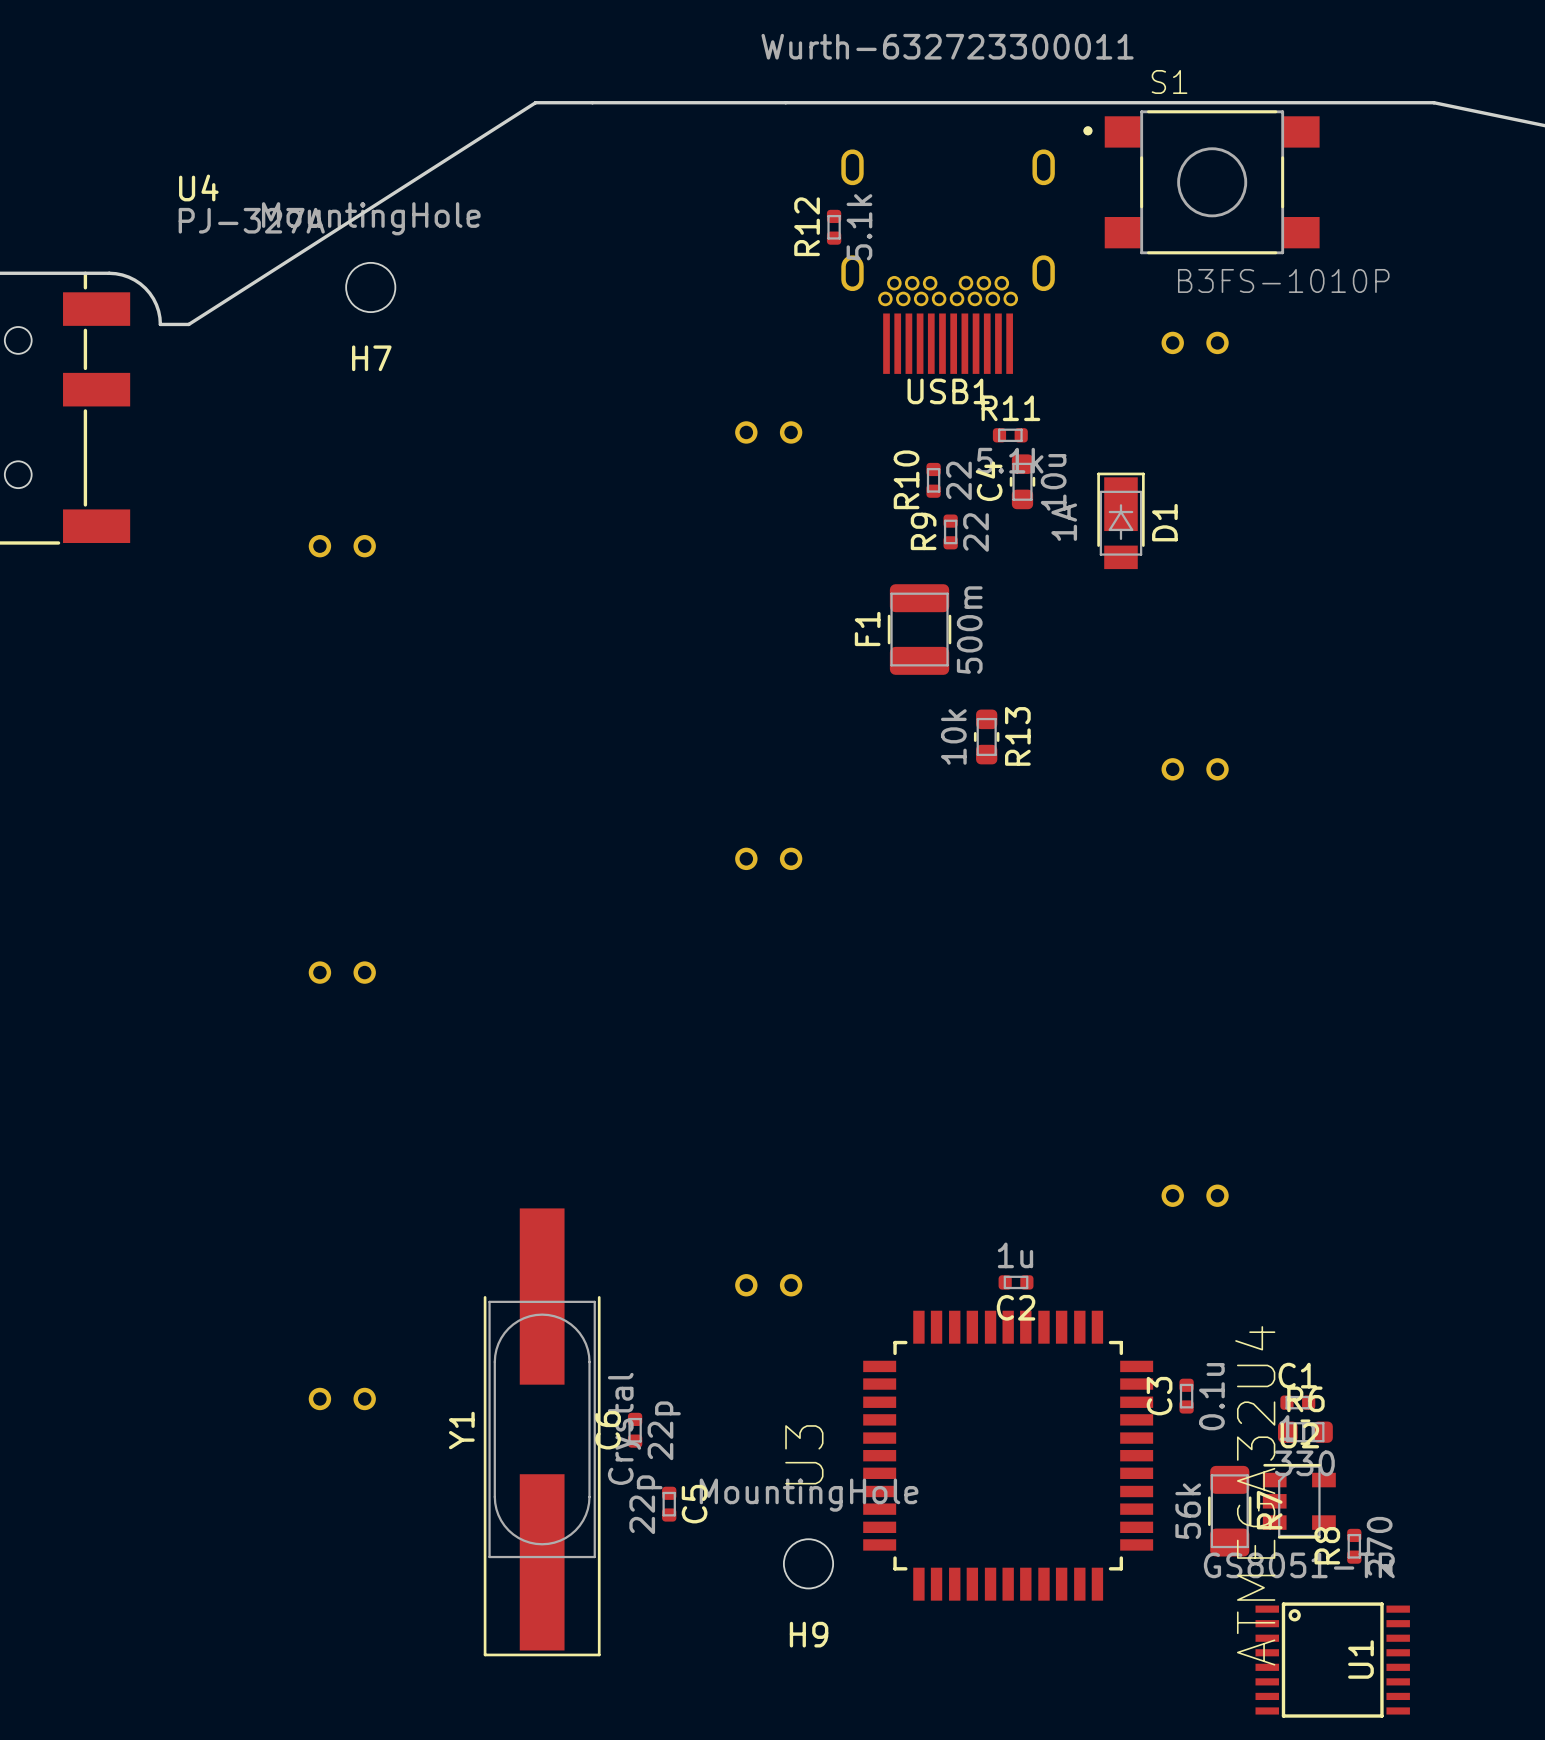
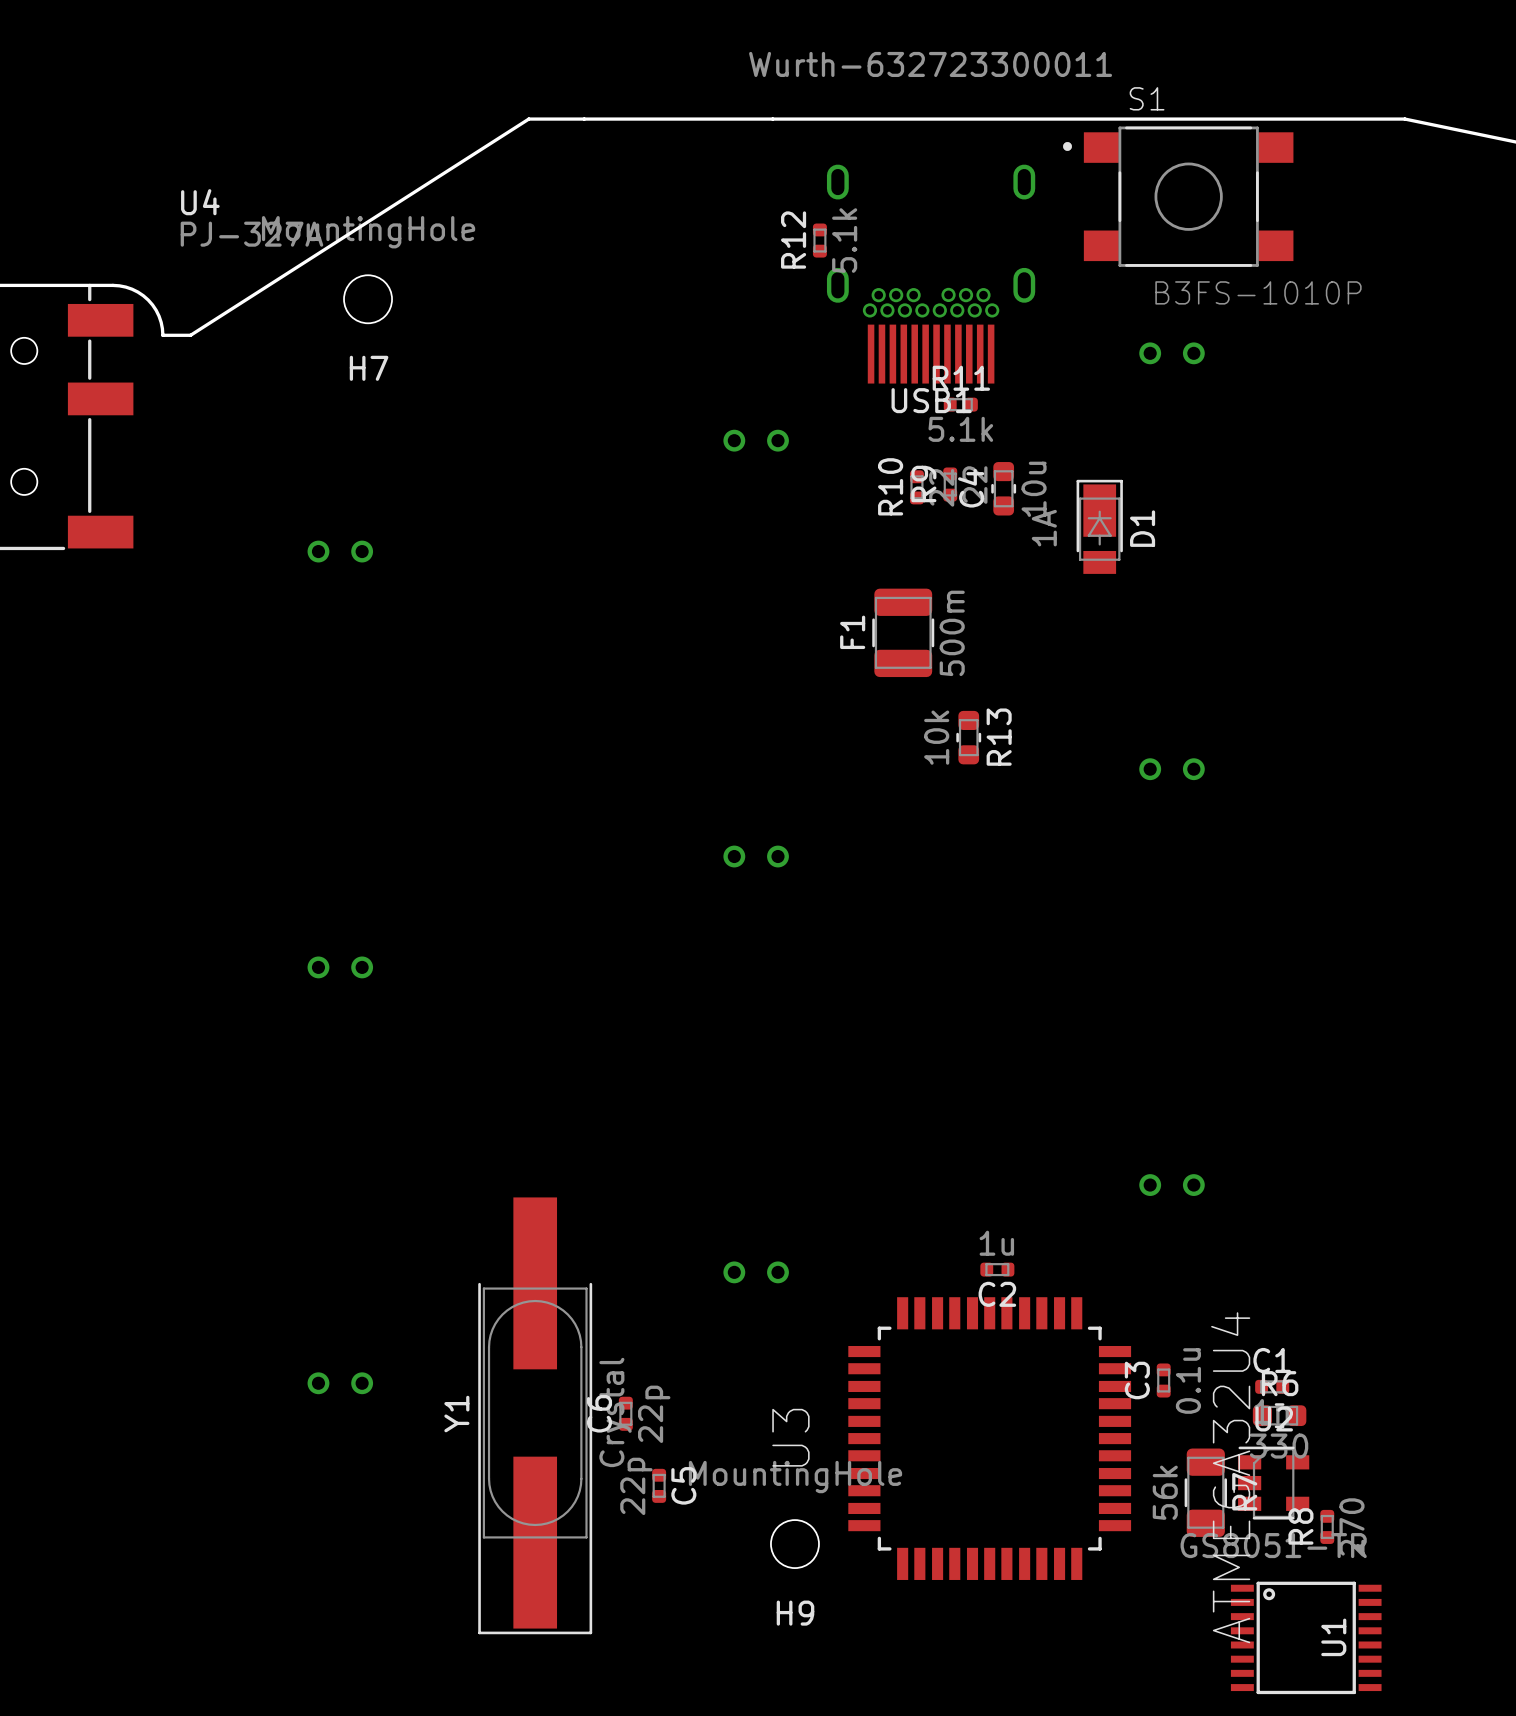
R11 position: (1010, 435) -> (960, 404)
R9 position: (950, 531) -> (950, 484)

